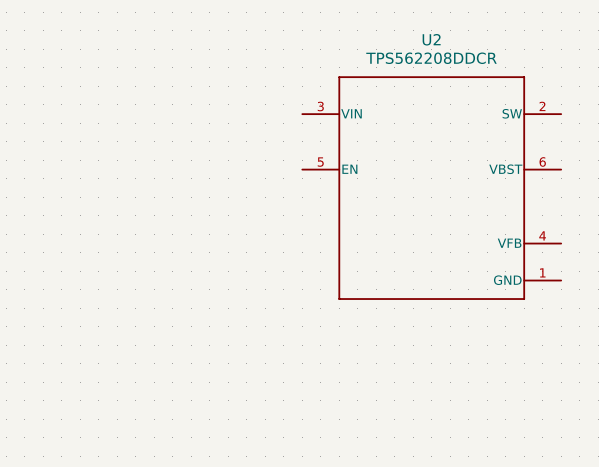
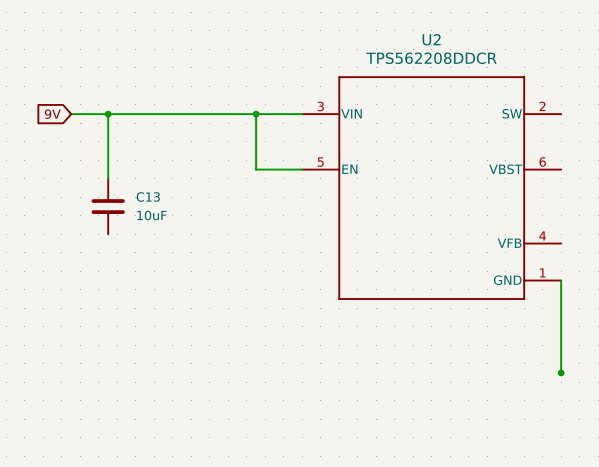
global label: none -> 9V (52, 114)
wire: none -> (71, 114) (302, 114)
wire: none -> (108, 114) (108, 178)
junction: none -> (108, 114)
wire: none -> (256, 114) (256, 169) (302, 169)
junction: none -> (256, 114)
C13: none -> 10uF (108, 206)
wire: none -> (561, 280) (561, 372)
junction: none -> (561, 372)

